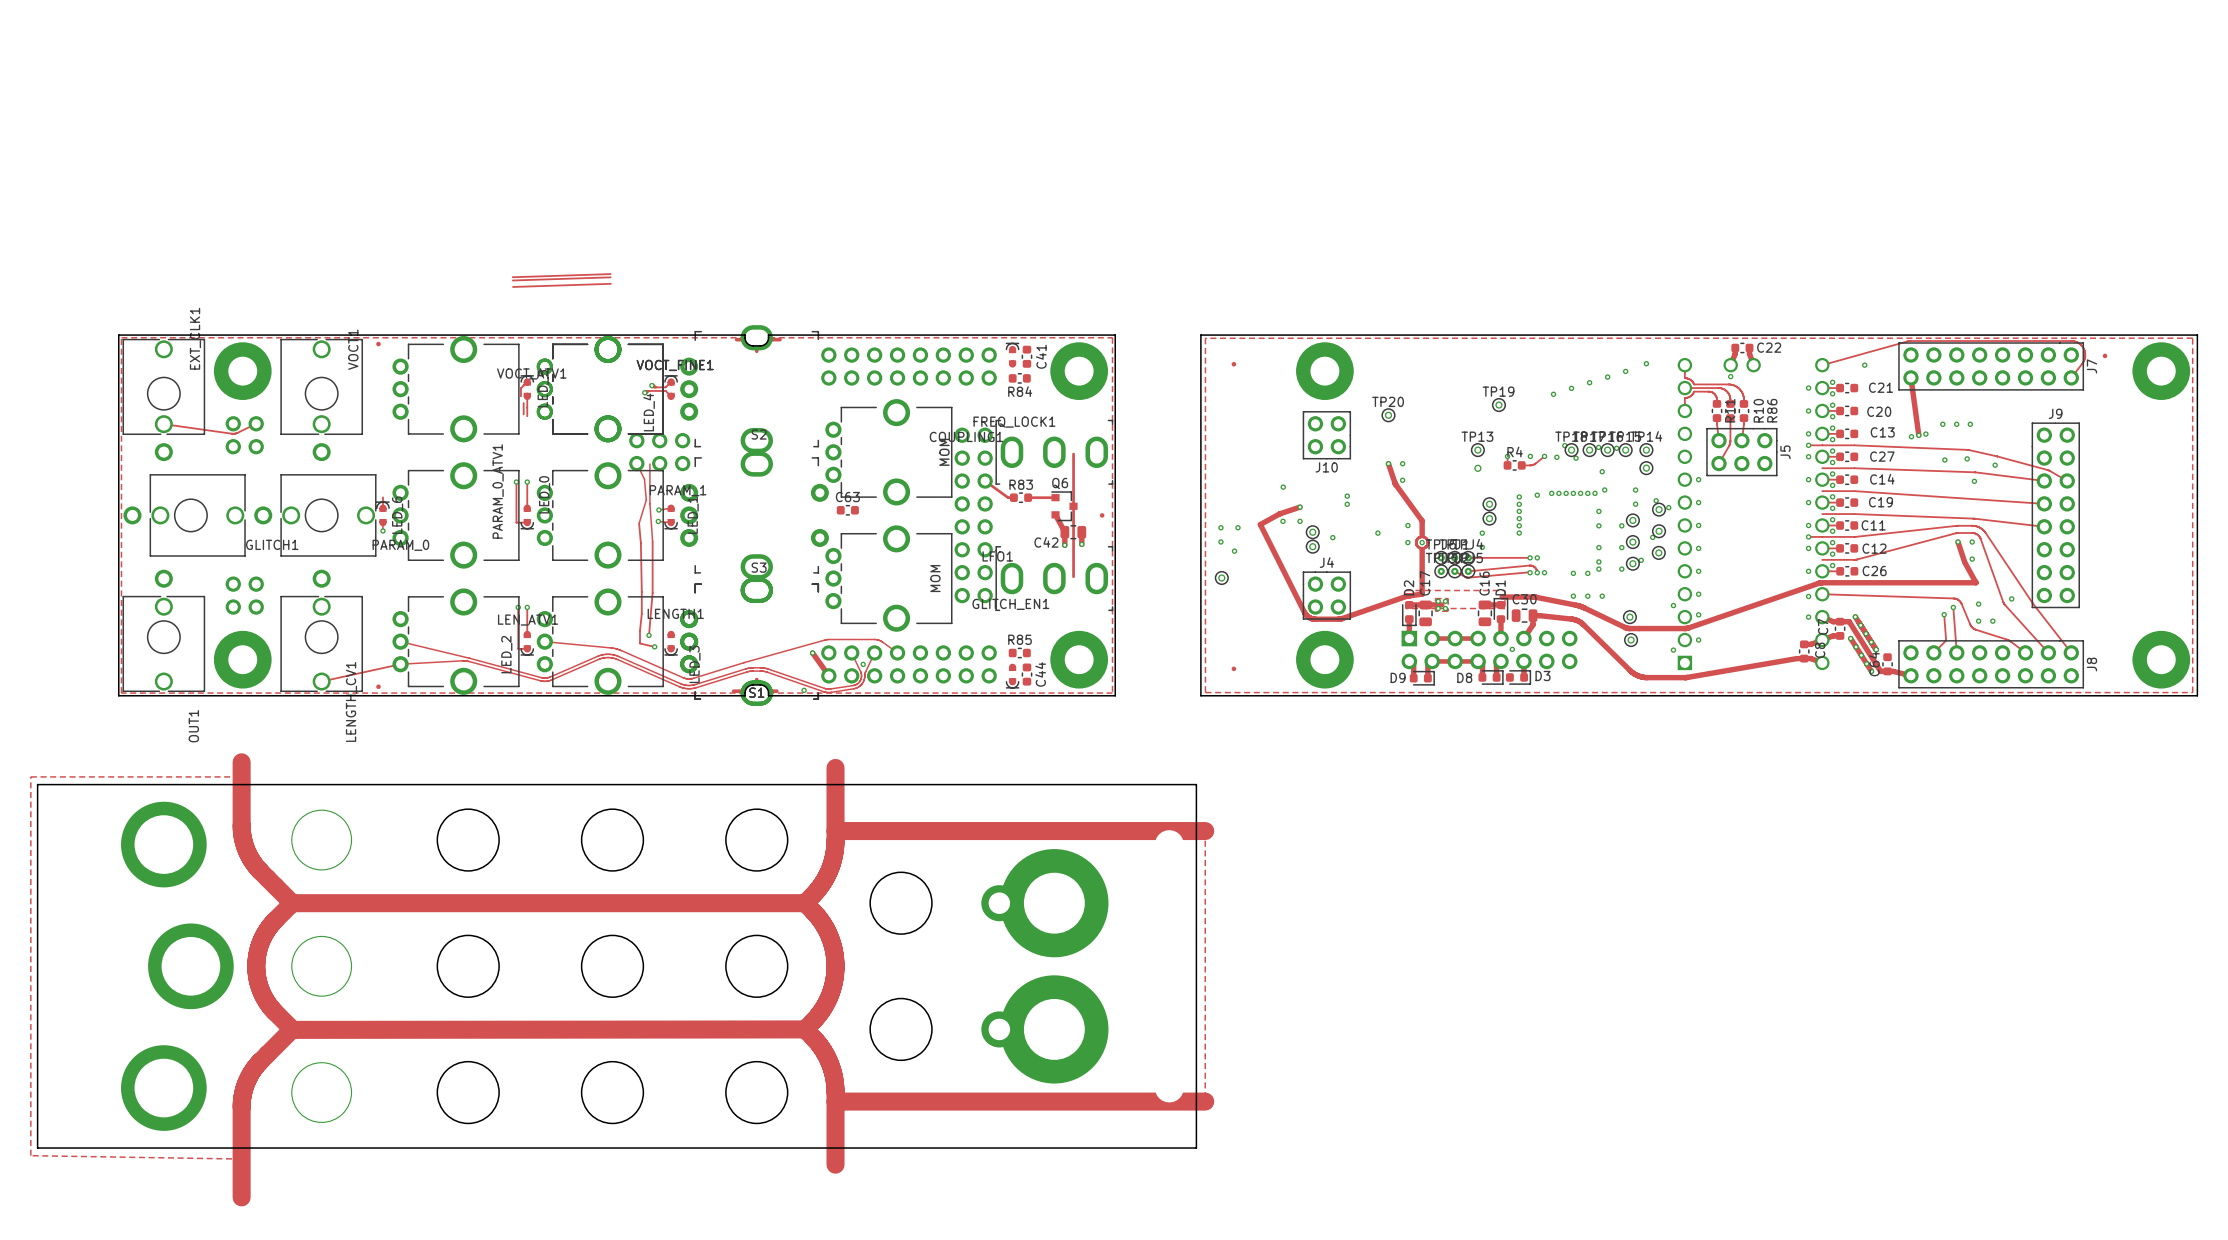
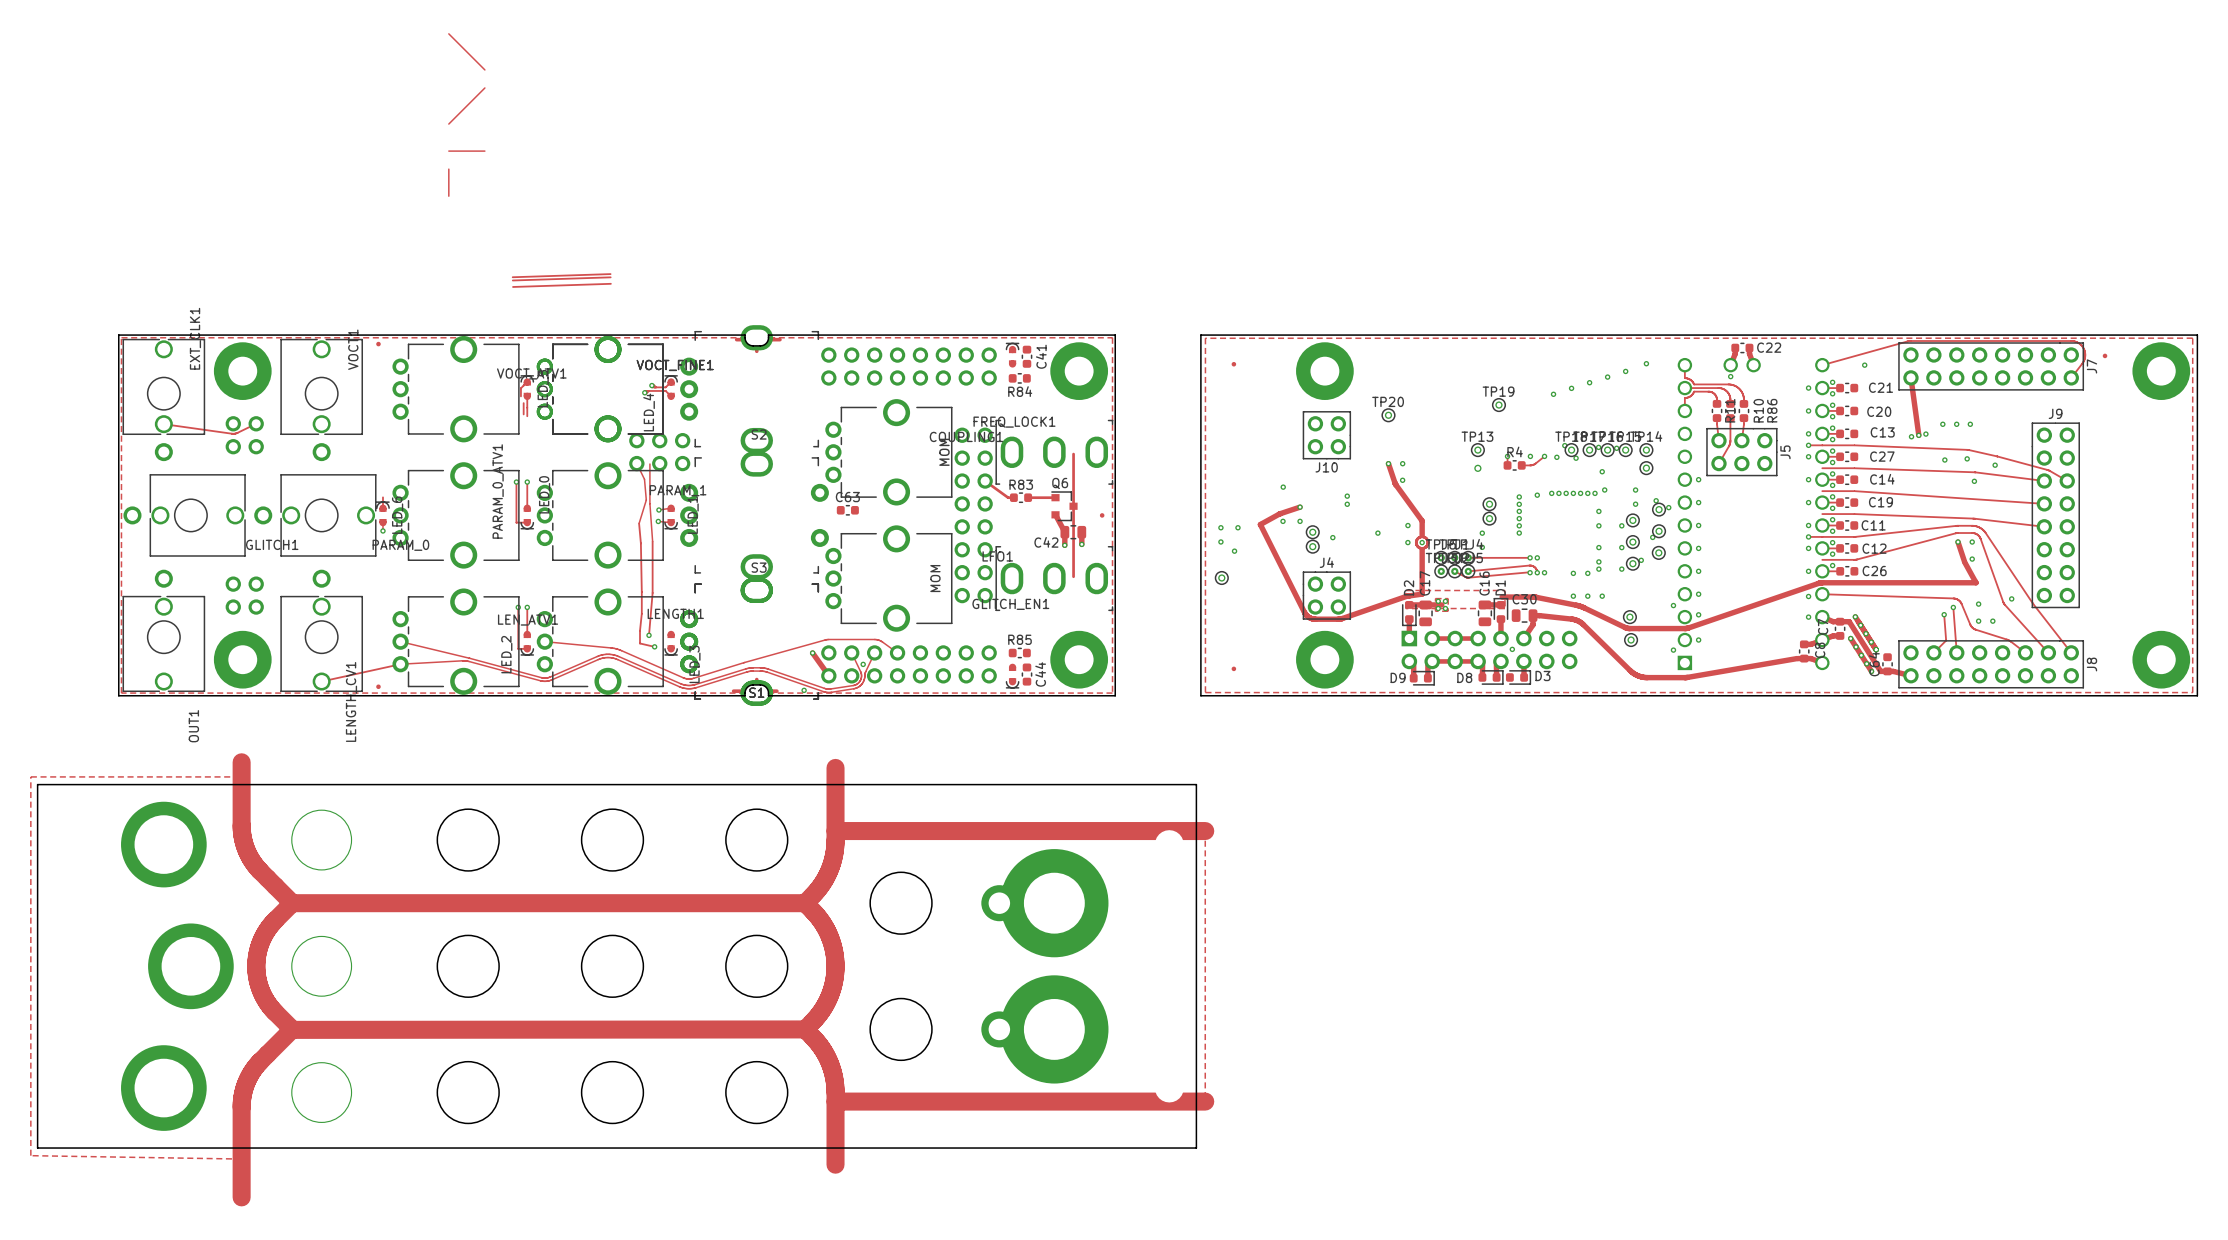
track: none -> (448, 33) (484, 69)
track: none -> (484, 87) (448, 124)
track: none -> (448, 151) (484, 151)
track: none -> (448, 169) (448, 196)

